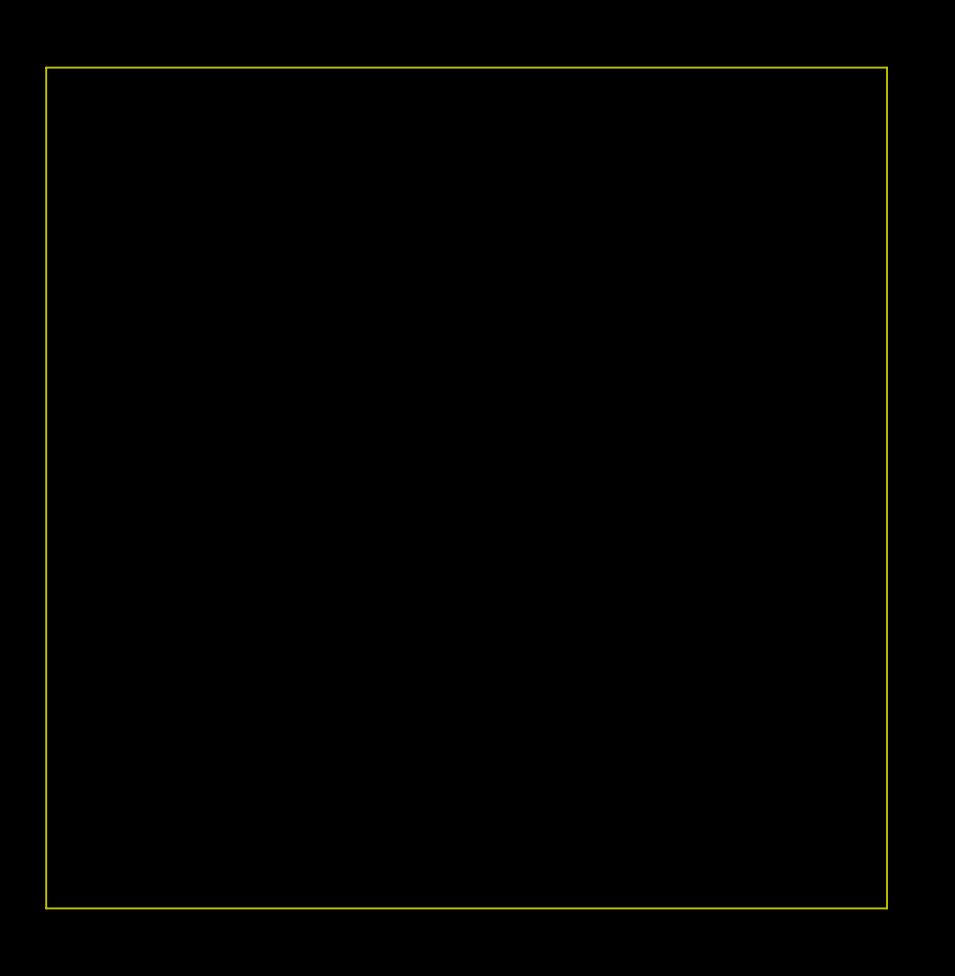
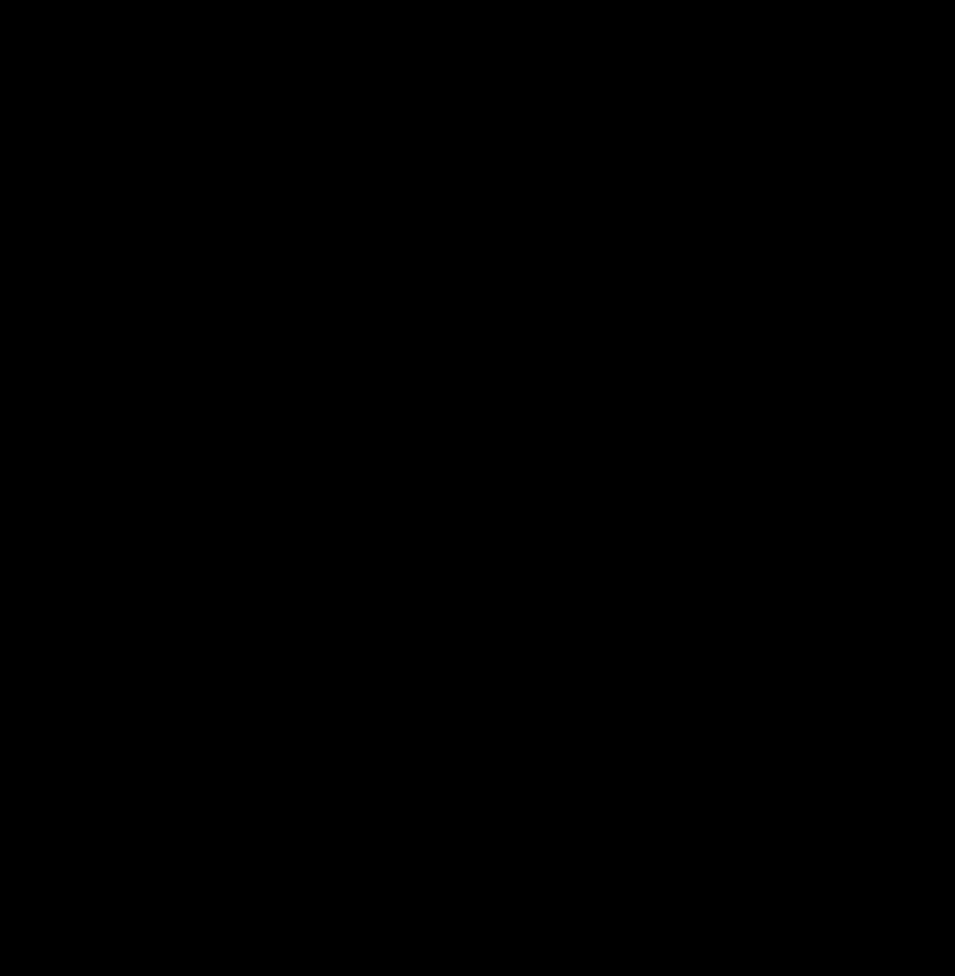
board edge: (46, 67) (887, 67) (887, 908) (46, 908) (46, 67) -> none

